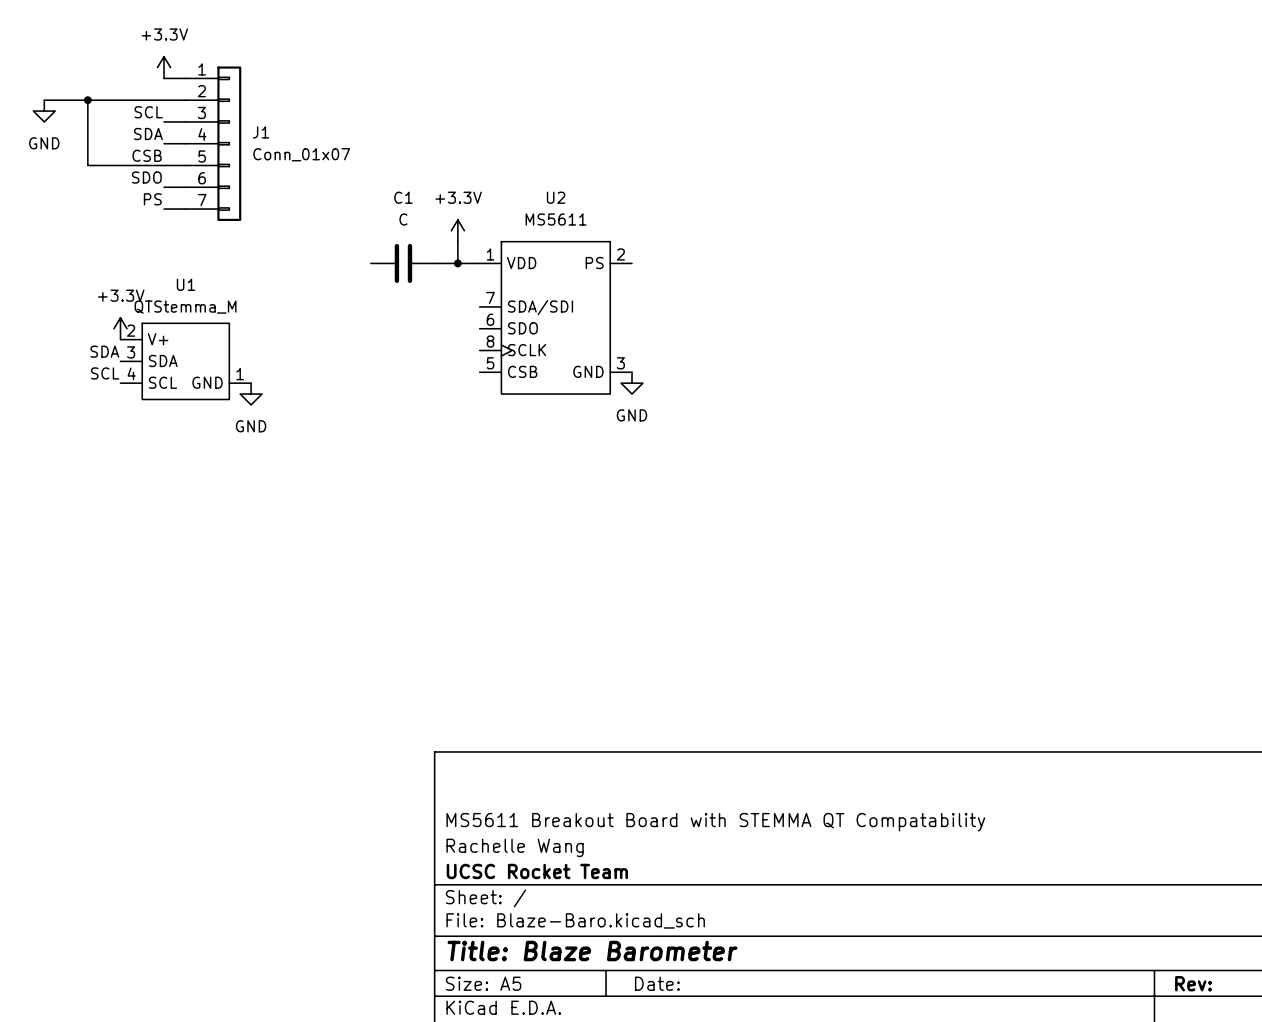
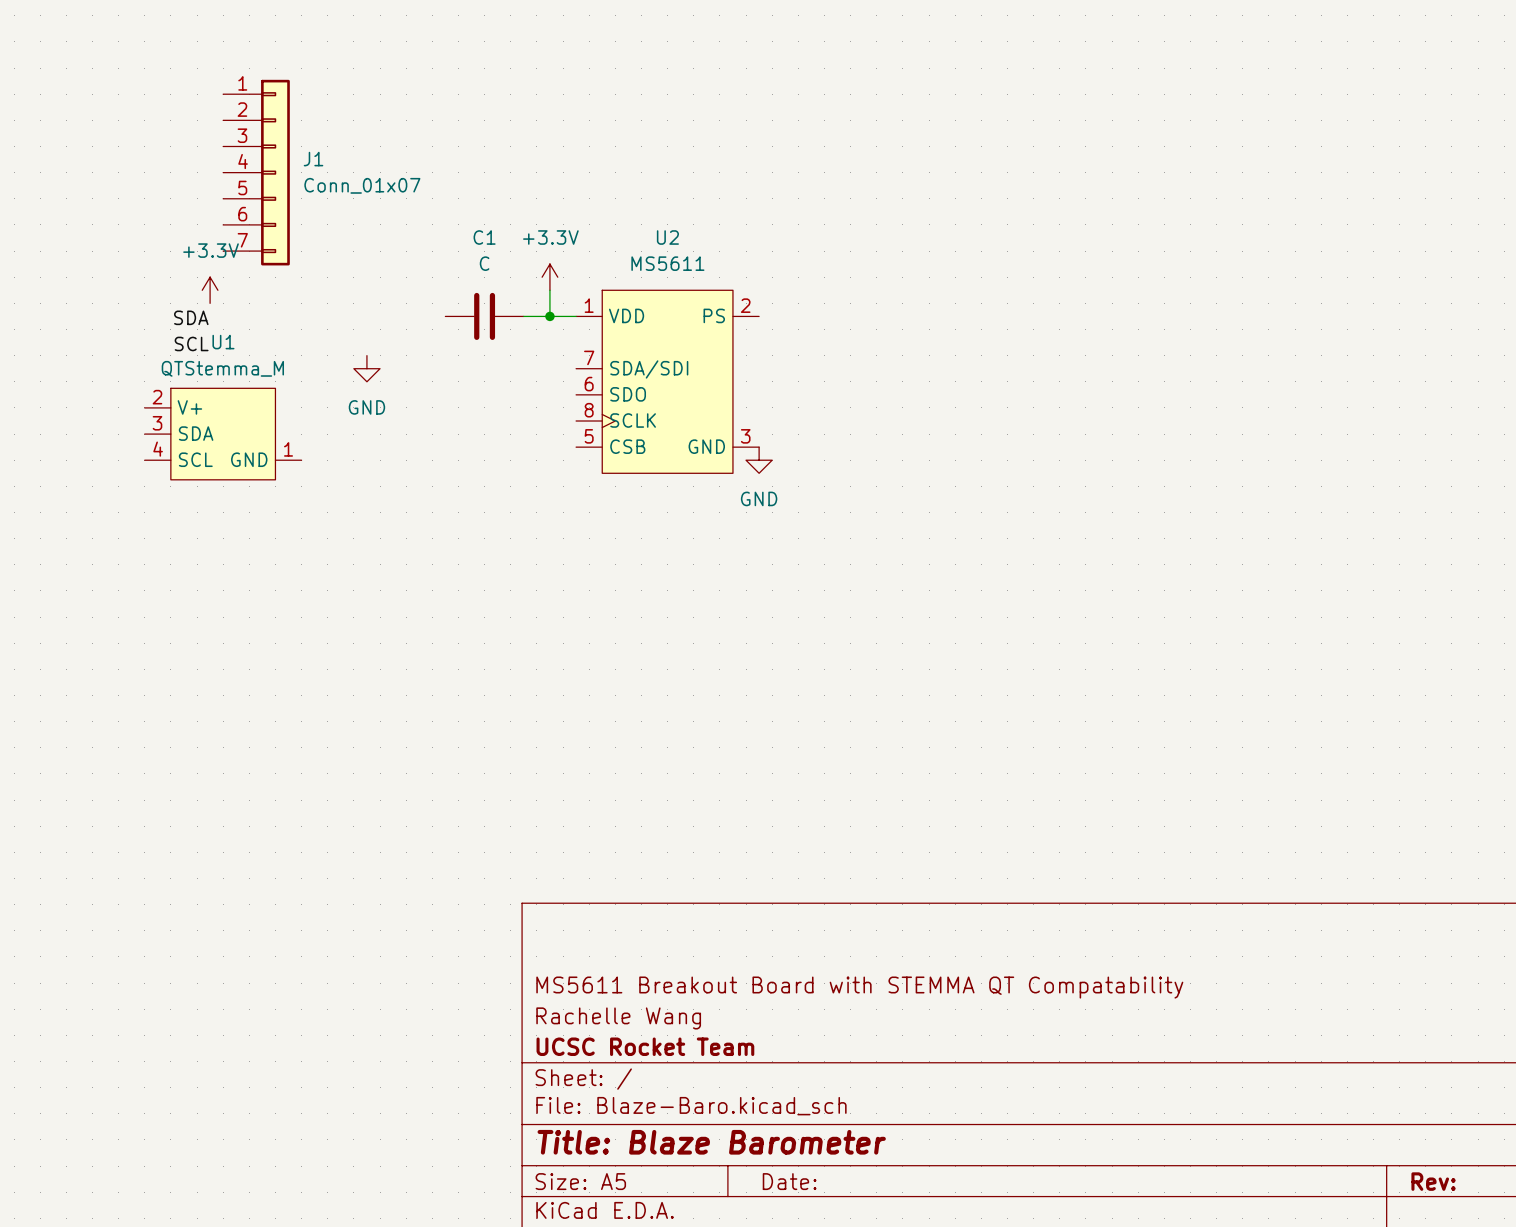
power symbol: +3.3V (164, 67) -> none
wire: (164, 78) (185, 78) -> none
wire: (44, 100) (185, 100) -> none
wire: (87, 100) (87, 165) (185, 165) -> none
junction: (87, 100) -> none
power symbol: GND (44, 111) -> none
label: SCL (148, 112) -> none
wire: (164, 121) (185, 121) -> none
label: SDA (148, 134) -> none
wire: (164, 143) (185, 143) -> none
label: CSB (147, 155) -> none
label: SDO (146, 177) -> none
wire: (164, 187) (185, 187) -> none
label: PS (152, 199) -> none
wire: (164, 209) (185, 209) -> none
power symbol: none -> +3.3V (210, 290)
label: none -> SDA (191, 317)
label: none -> SCL (191, 343)
power symbol: +3.3V (120, 328) -> none
label: SDA (104, 351) -> none
label: SCL (105, 373) -> none
power symbol position: GND (251, 394) -> GND (366, 368)

